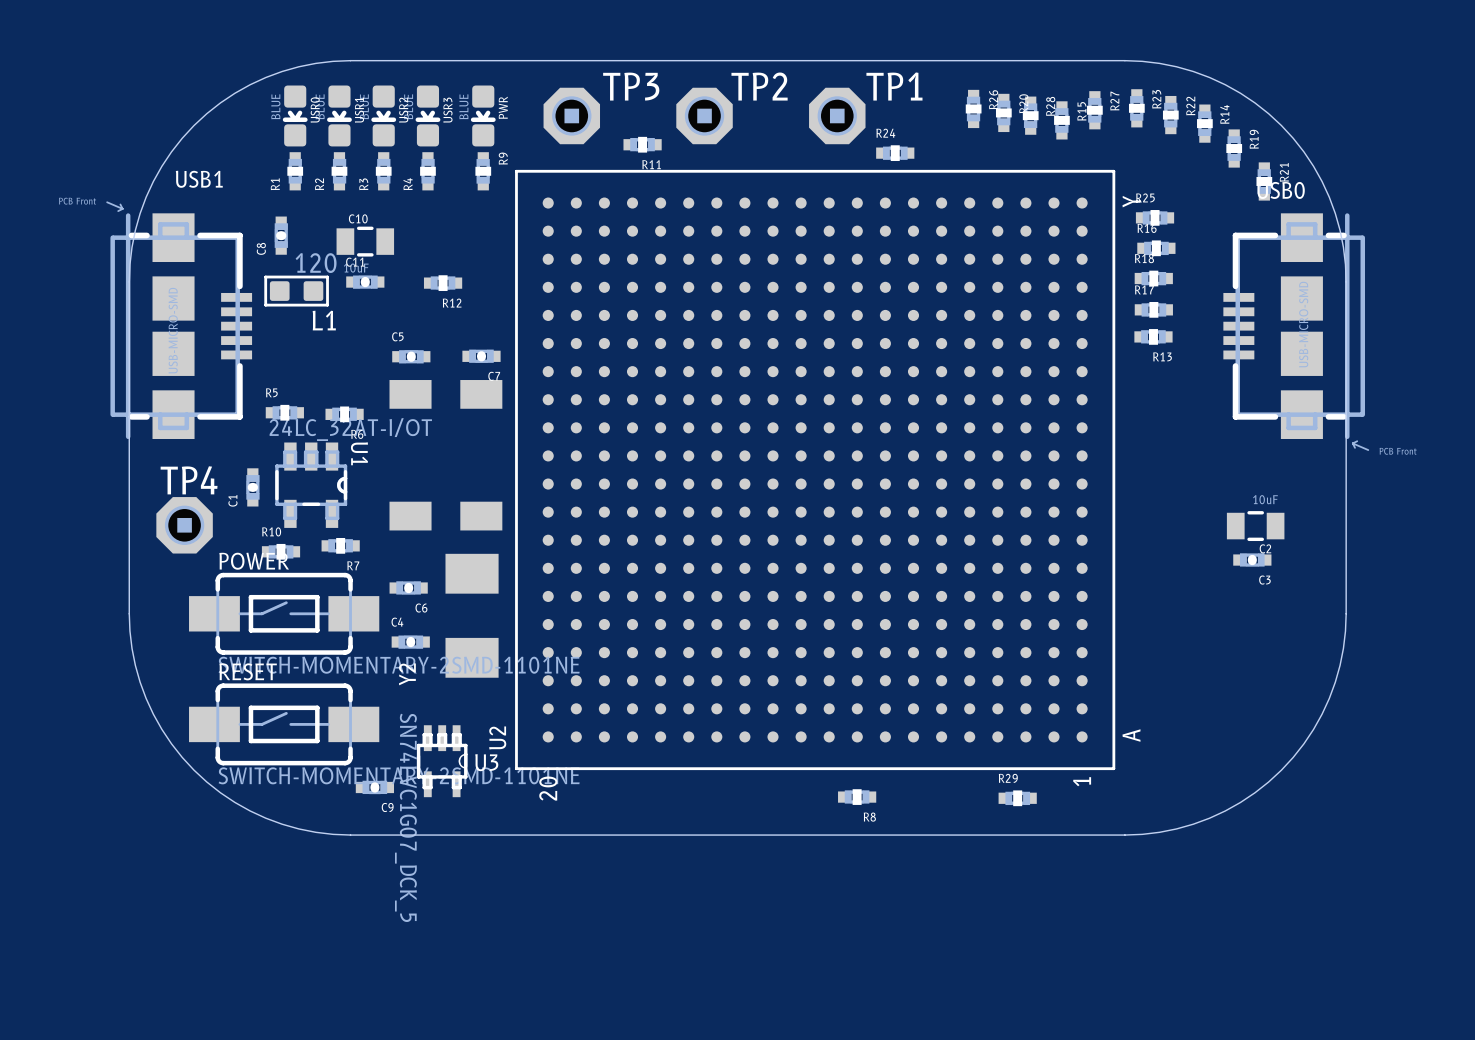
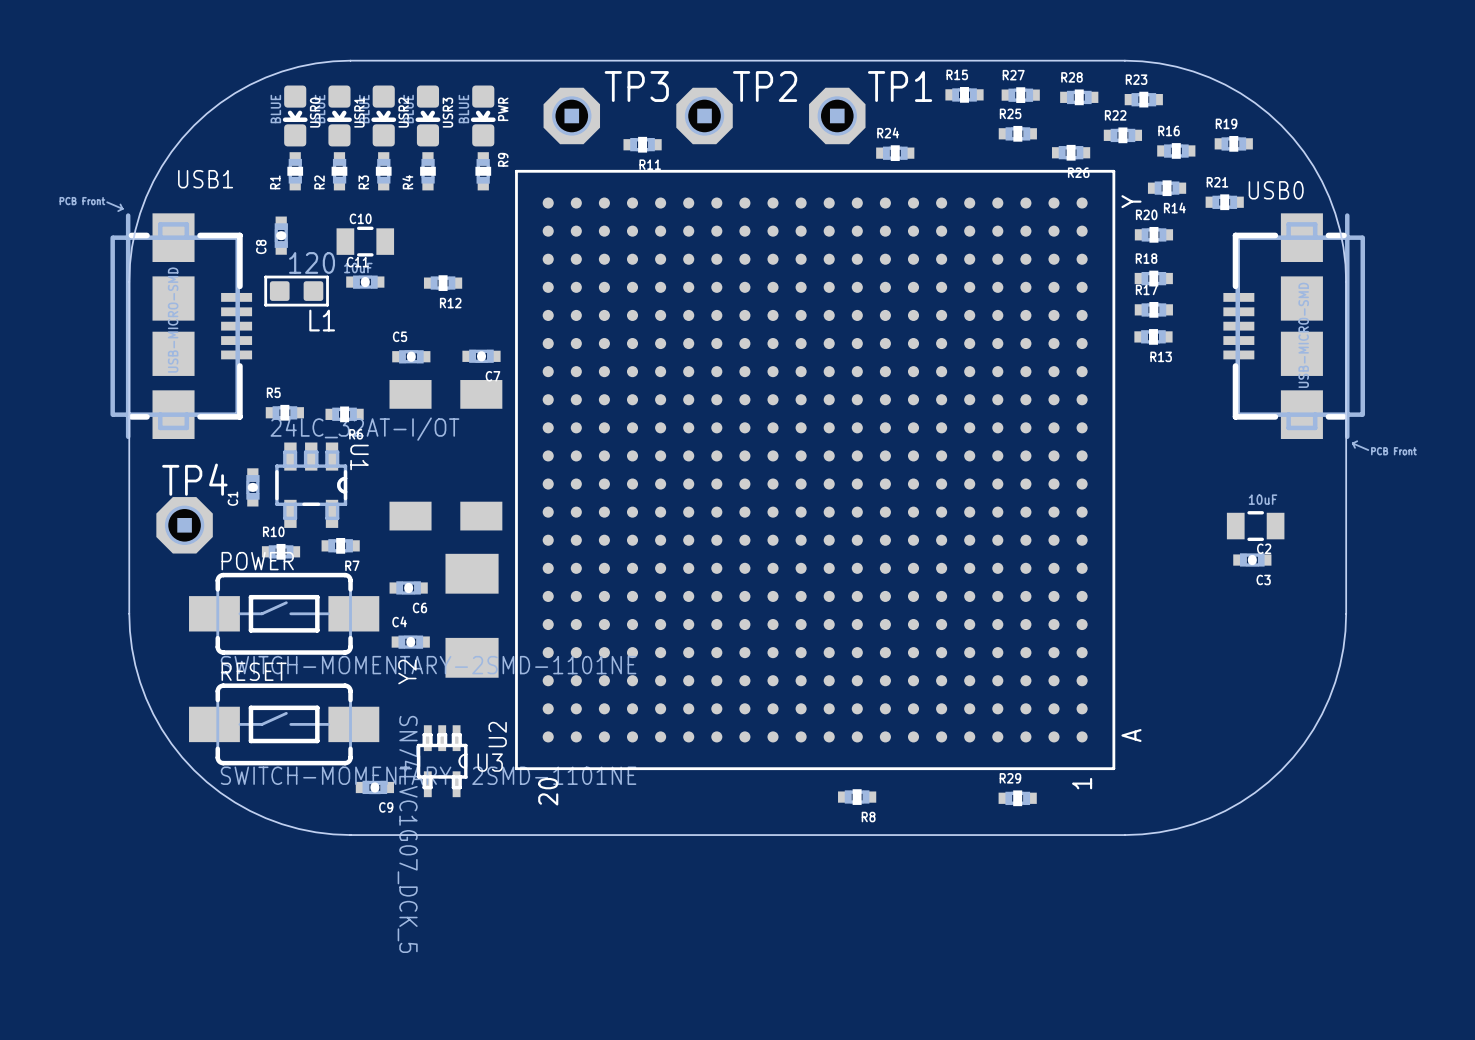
R26 rotation: 0° (973, 108) -> 90° clockwise (1071, 152)
R26 position: (973, 108) -> (1071, 152)
R23 rotation: 0° (1136, 108) -> 90° clockwise (1143, 99)
R27 rotation: 0° (1094, 110) -> 90° clockwise (1020, 95)
R27 position: (1094, 110) -> (1020, 95)
R20 rotation: 0° (1003, 112) -> 90° clockwise (1153, 234)
R20 position: (1003, 112) -> (1153, 234)
R28 rotation: 0° (1030, 115) -> 90° clockwise (1079, 97)
R28 position: (1030, 115) -> (1079, 97)
R22 rotation: 0° (1170, 115) -> 90° clockwise (1122, 135)
R22 position: (1170, 115) -> (1122, 135)
R15 rotation: 0° (1061, 120) -> 90° clockwise (964, 94)
R15 position: (1061, 120) -> (964, 94)
R14 rotation: 0° (1204, 123) -> 90° clockwise (1167, 188)
R14 position: (1204, 123) -> (1167, 188)
R19 rotation: 0° (1234, 148) -> 90° clockwise (1233, 143)
R21 rotation: 0° (1264, 181) -> 90° clockwise (1224, 202)
R21 position: (1264, 181) -> (1224, 202)
R25 position: (1155, 217) -> (1017, 133)
R16 position: (1156, 248) -> (1176, 150)

